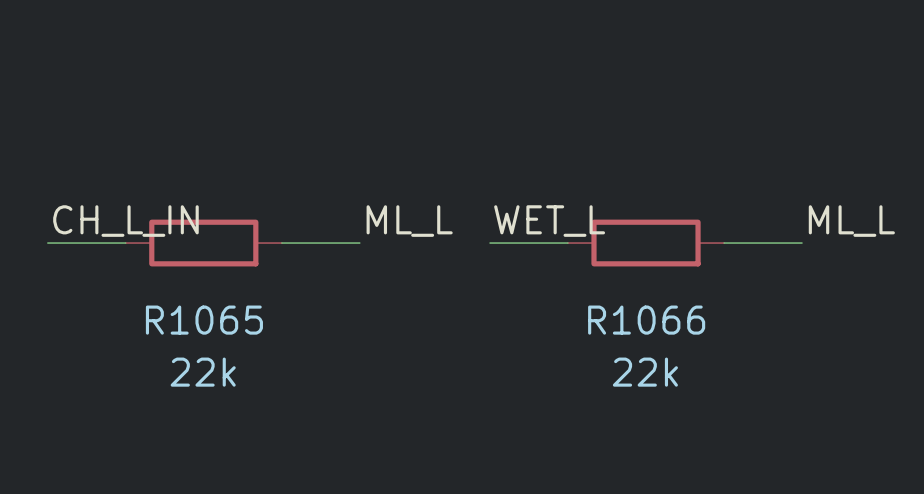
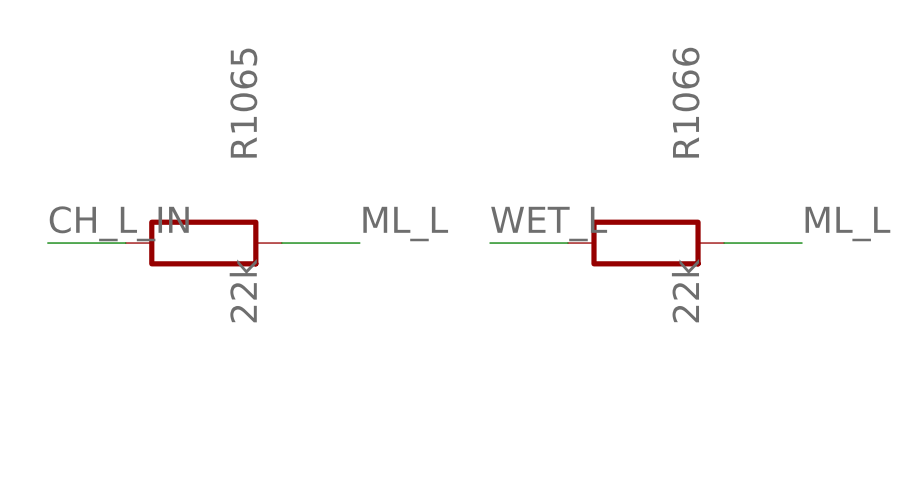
R1065 name rotation: 0° (204, 320) -> 90° counterclockwise (243, 103)
R1065 name position: R1065 (204, 320) -> R1065 (243, 103)
R1066 name rotation: 0° (646, 320) -> 90° counterclockwise (686, 102)
R1066 name position: R1066 (646, 320) -> R1066 (686, 102)
R1065 value rotation: 0° (203, 372) -> 90° counterclockwise (243, 290)
R1065 value position: 22k (203, 372) -> 22k (243, 290)
R1066 value rotation: 0° (645, 372) -> 90° counterclockwise (685, 290)
R1066 value position: 22k (645, 372) -> 22k (685, 290)

